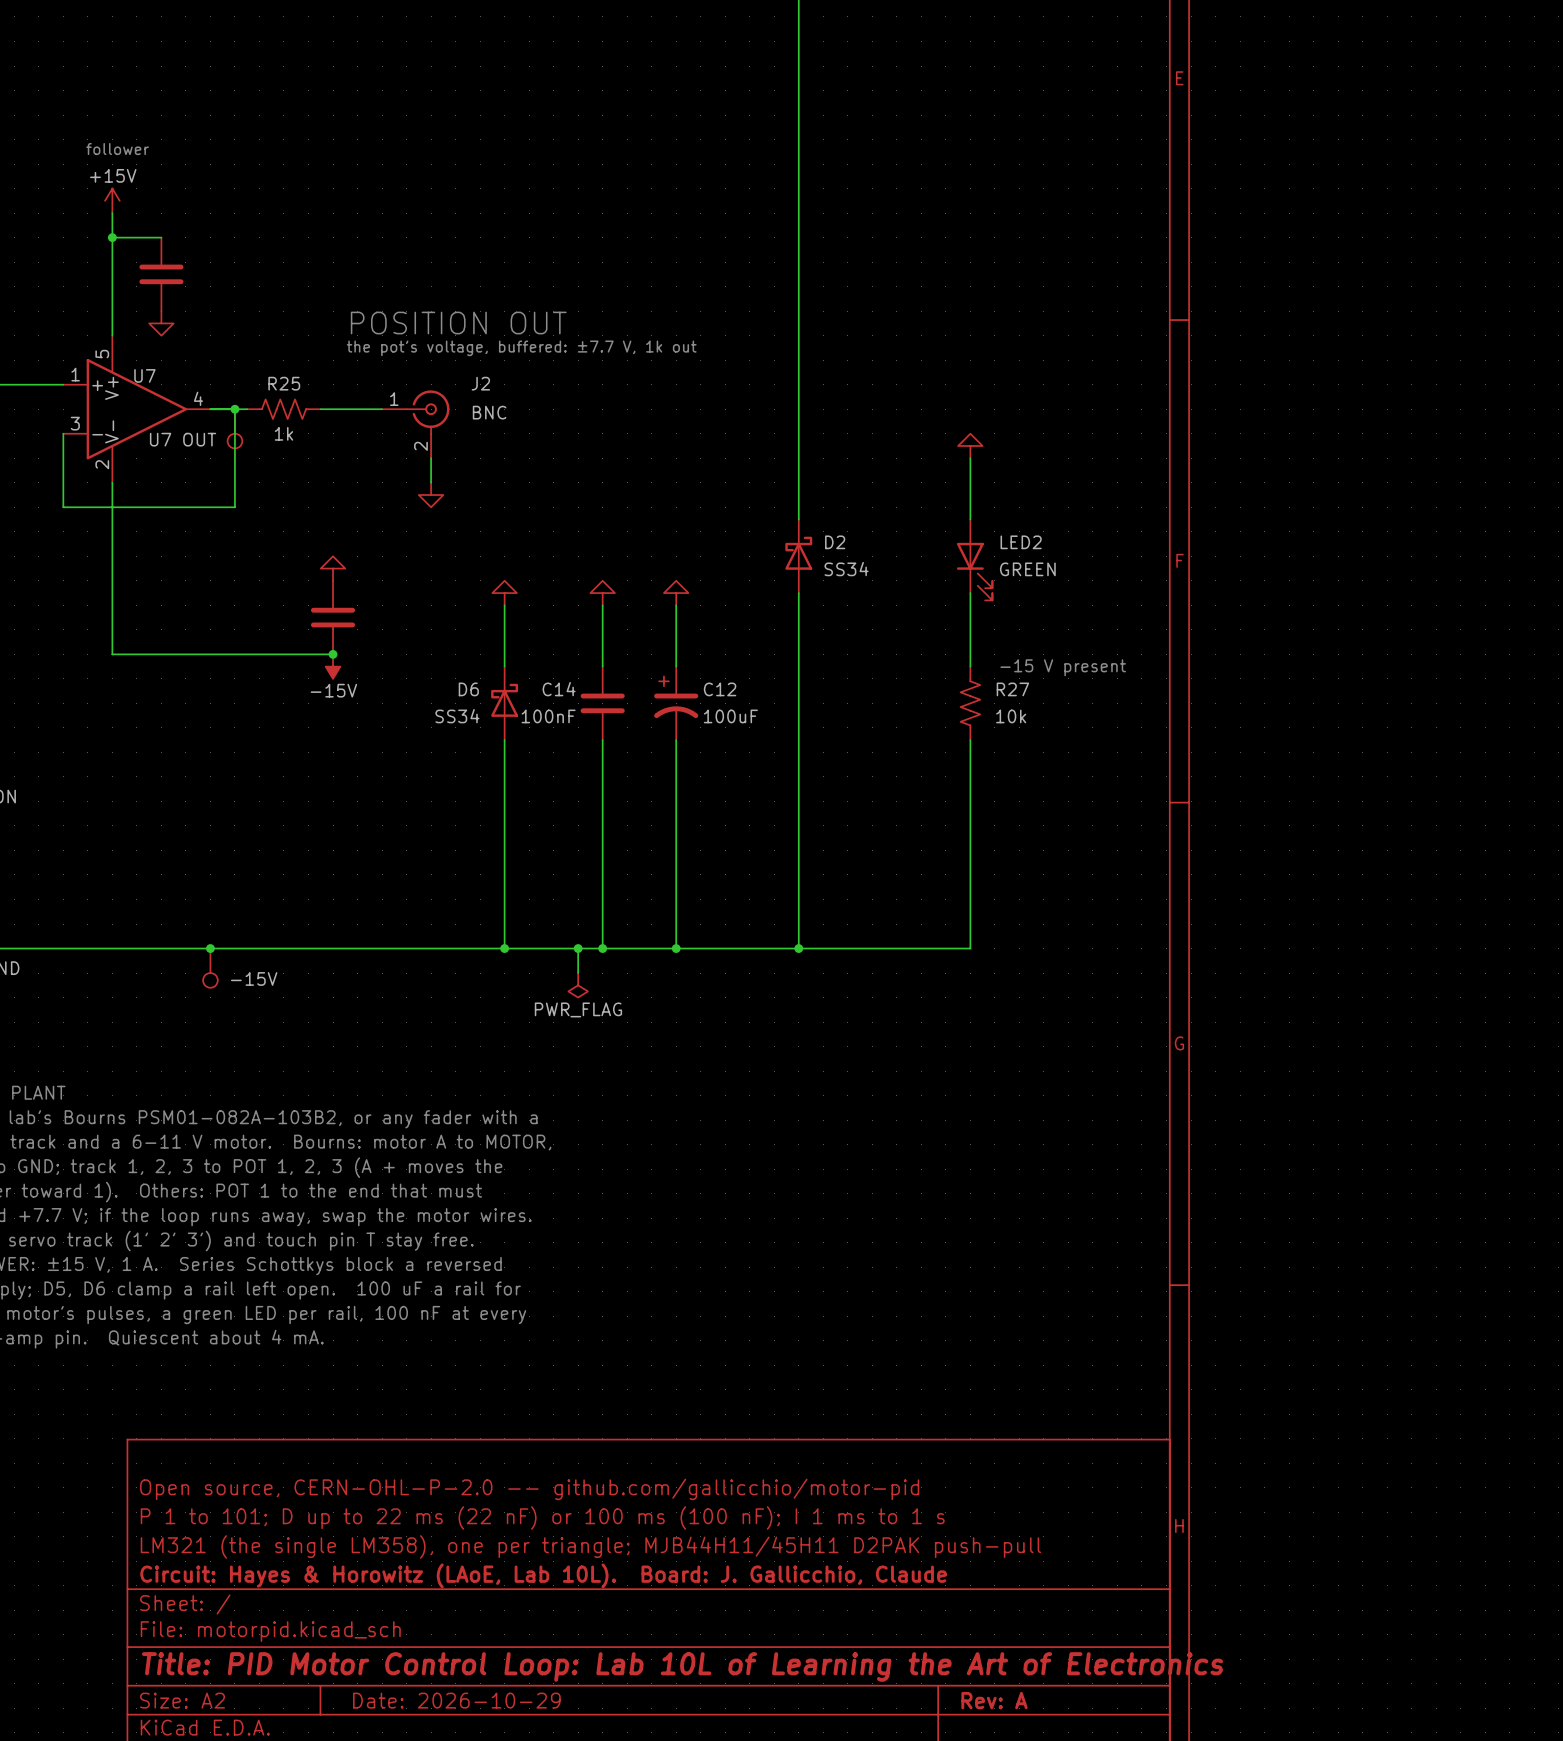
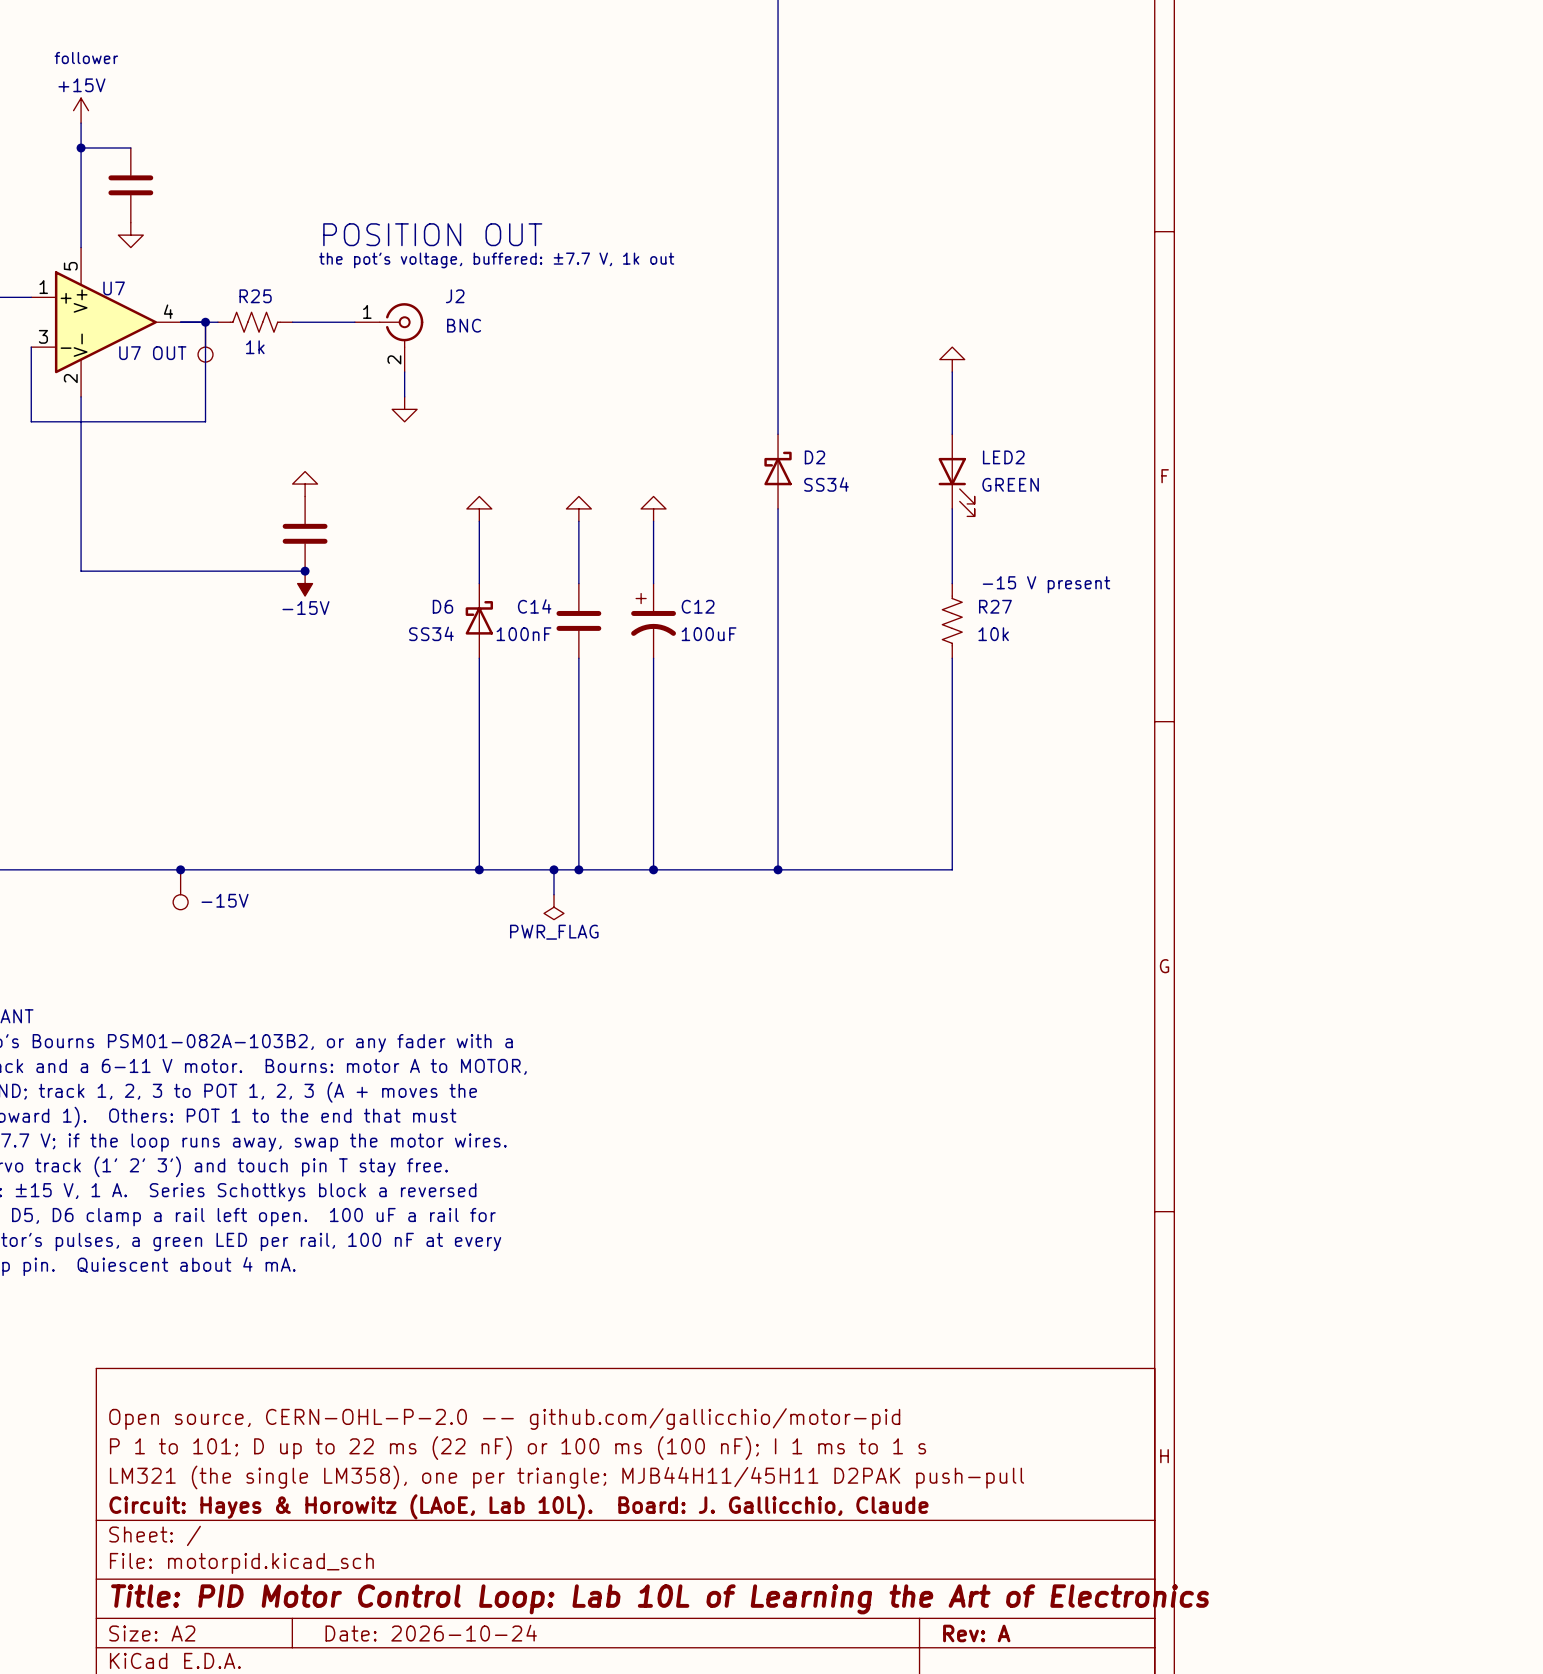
title block: Date: 2026-10-29 (456, 1700) -> Date: 2026-10-24 (431, 1633)

